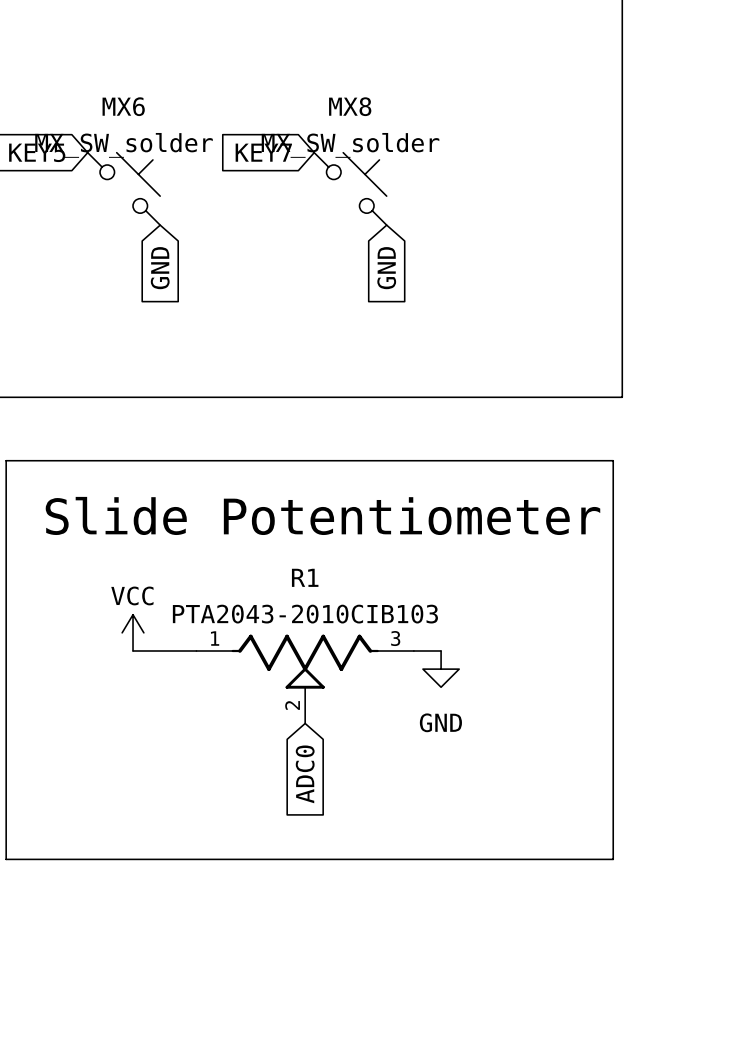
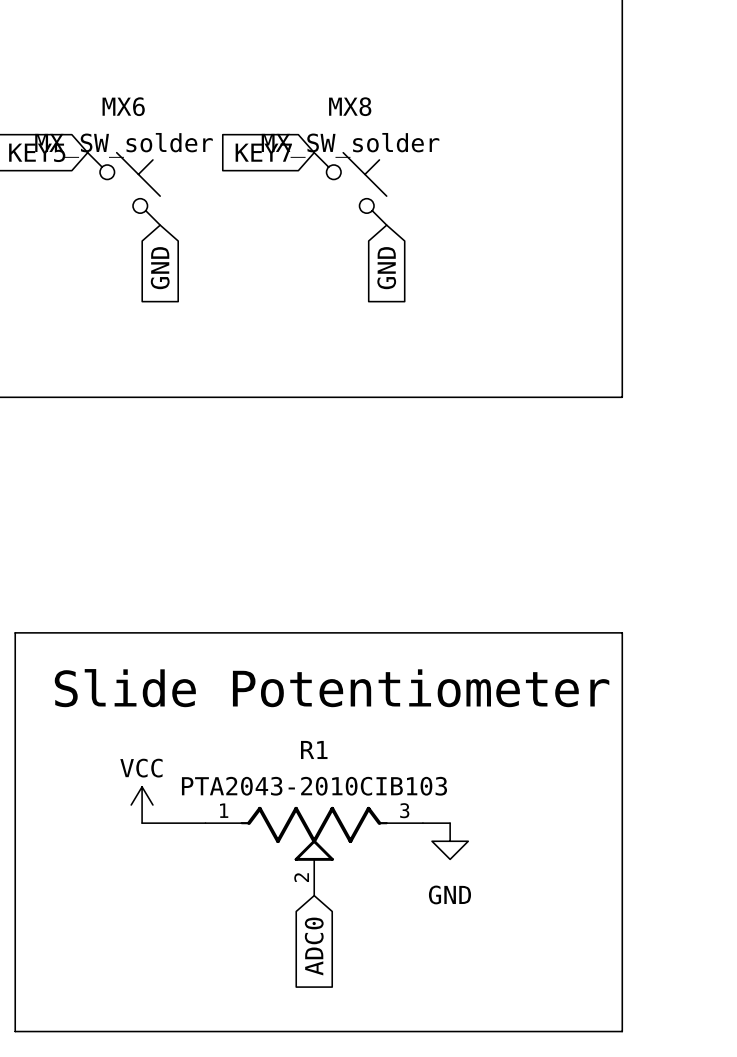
line: (6, 460) (613, 460) (613, 859) (6, 859) (6, 460) -> (15, 632) (622, 632) (622, 1031) (15, 1031) (15, 632)
text position: Slide Potentiometer (322, 515) -> Slide Potentiometer (332, 688)
power symbol position: VCC (133, 632) -> VCC (142, 805)
wire: (133, 650) (196, 650) -> (142, 823) (205, 823)
wire: (413, 650) (441, 650) -> (422, 823) (450, 823)
power symbol position: GND (441, 669) -> GND (450, 841)
R1 position: (305, 679) -> (314, 851)
global label position: ADC0 (305, 774) -> ADC0 (314, 946)

